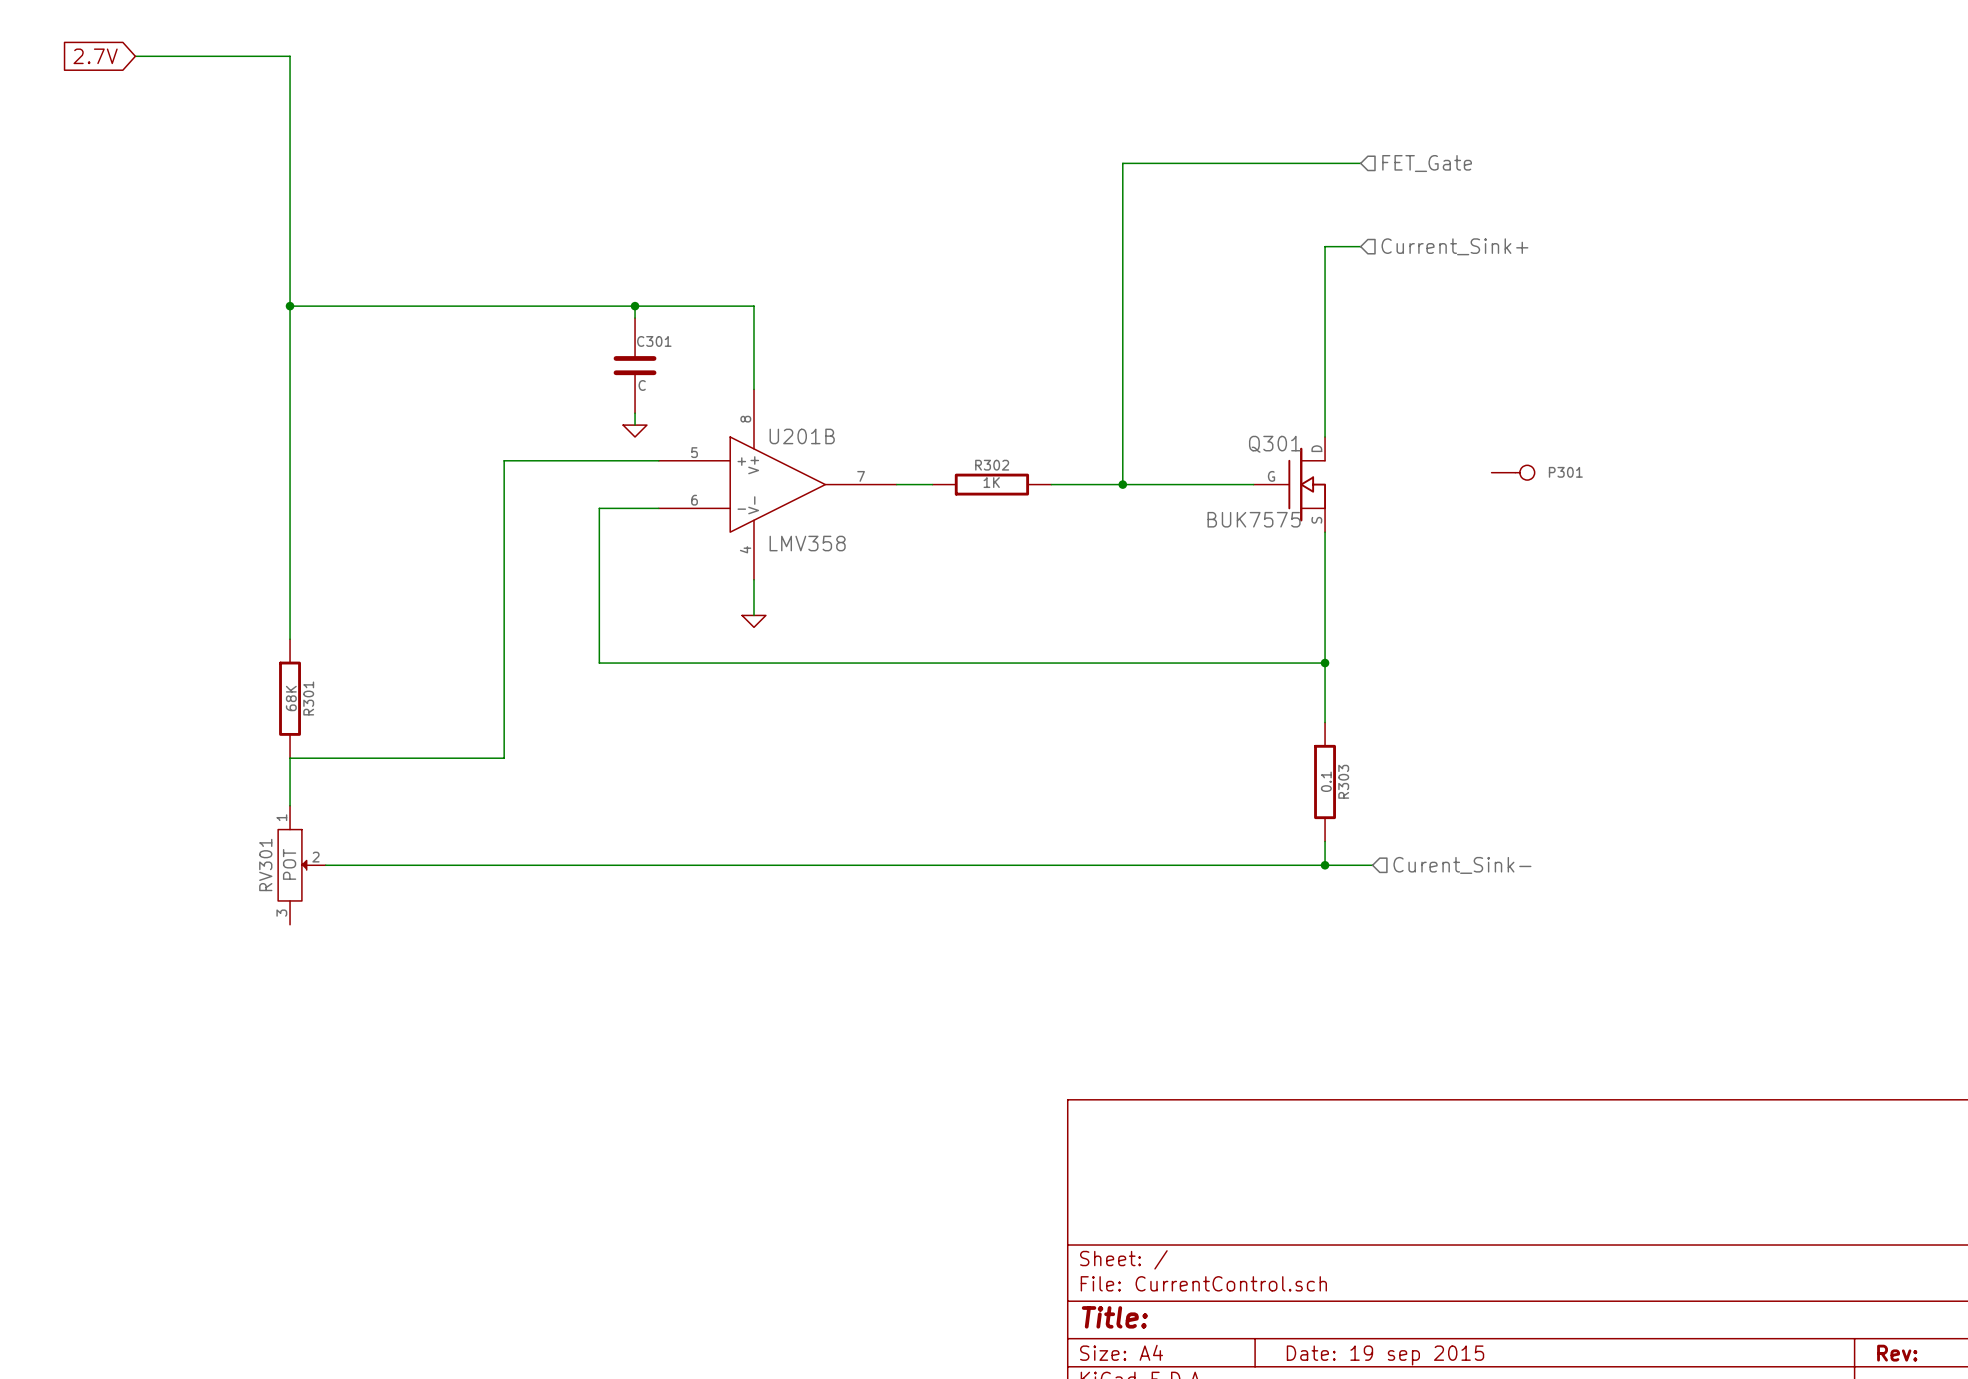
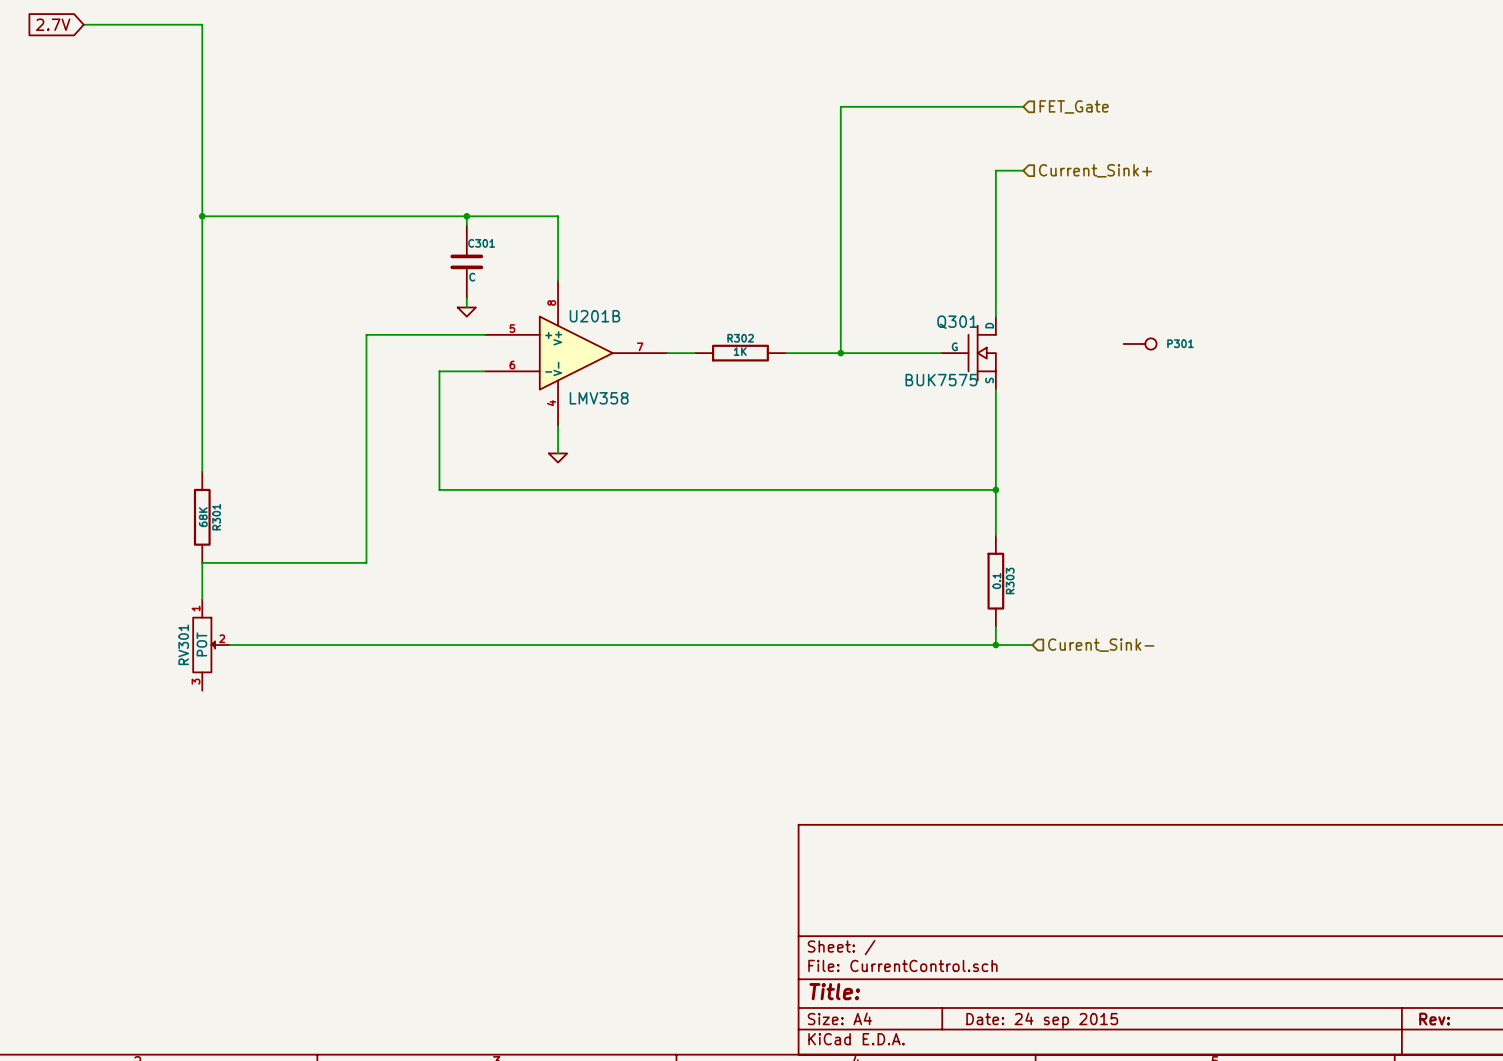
title block: Date: 19 sep 2015 (1385, 1355) -> Date: 24 sep 2015 (1042, 1020)

